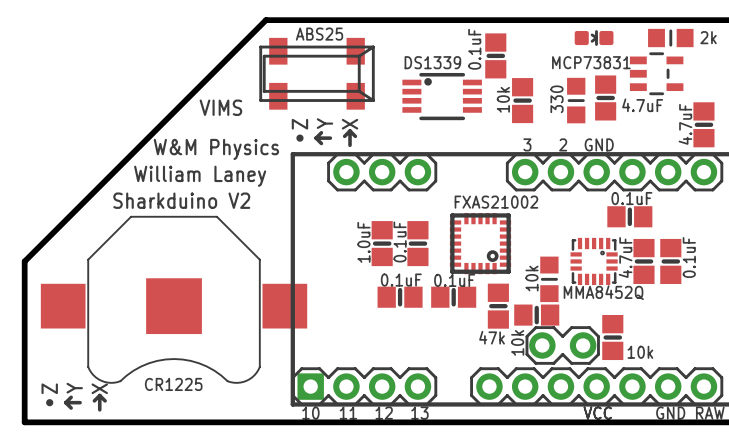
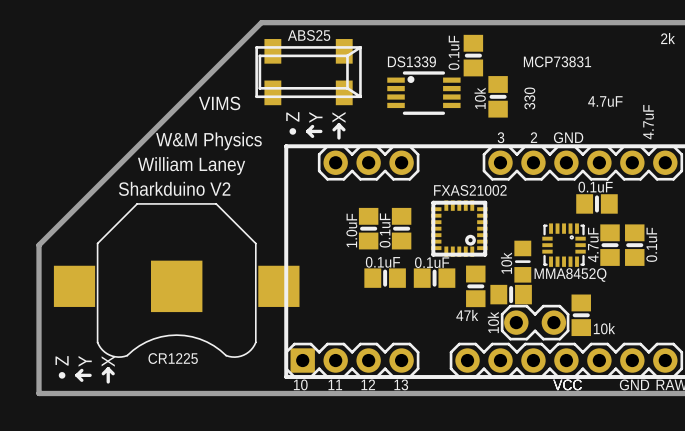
part: (594, 38) -> none
part: (670, 38) -> none
part: (656, 73) -> none
part: (605, 97) -> none
part: (576, 100) -> none
part: (703, 124) -> none

